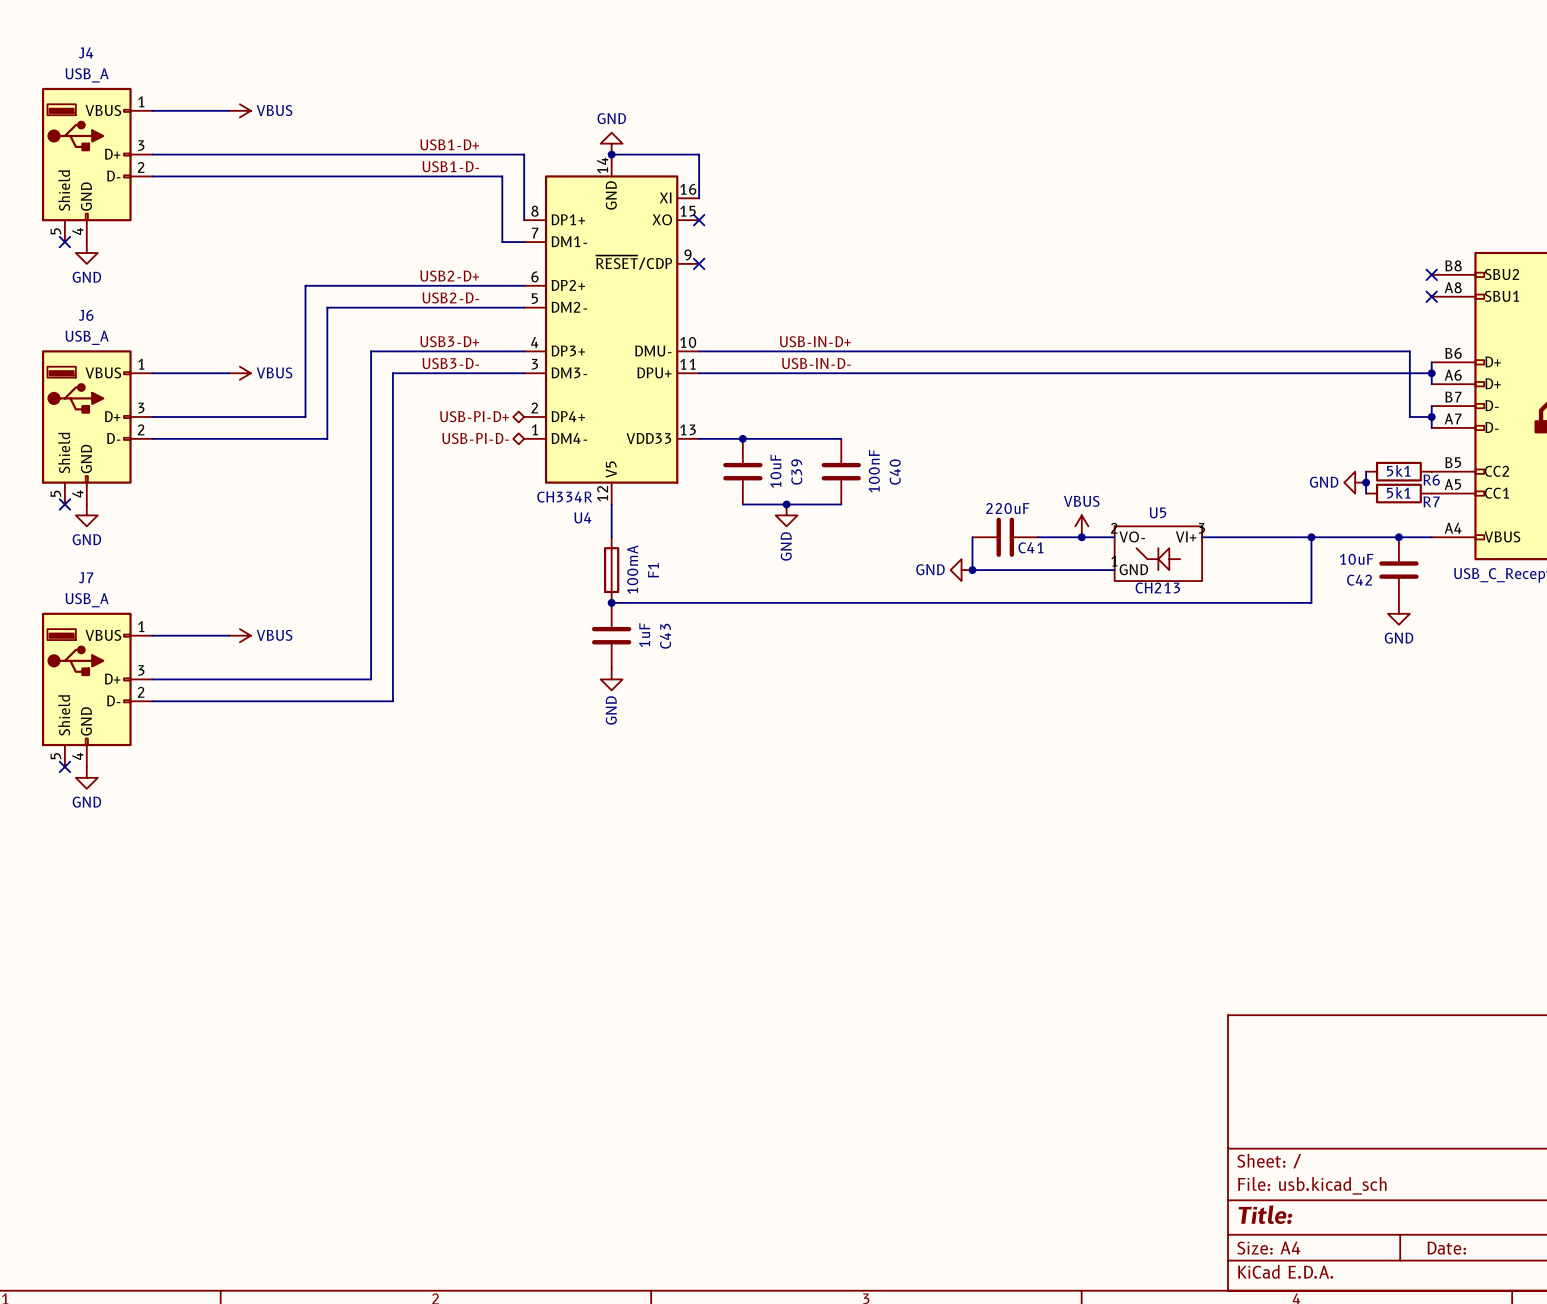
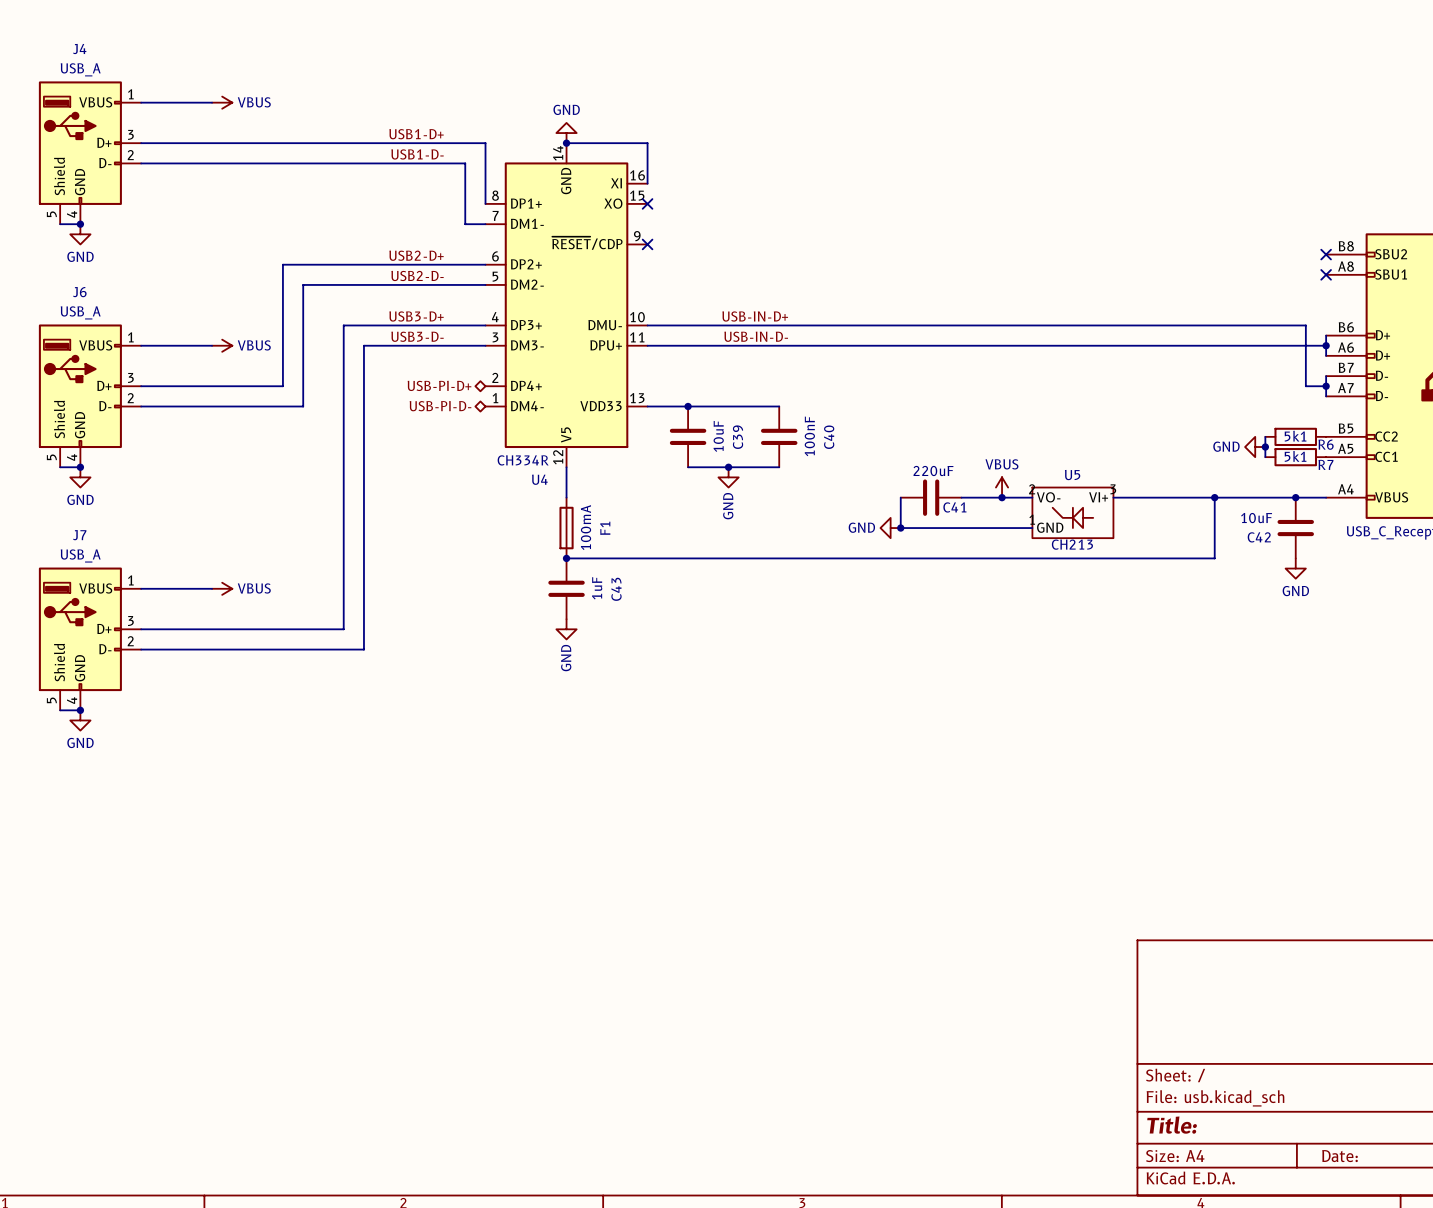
wire: none -> (60, 224) (80, 224)
no-connect mark: (64, 242) -> none
junction: none -> (80, 224)
wire: none -> (60, 467) (80, 467)
no-connect mark: (64, 504) -> none
junction: none -> (80, 467)
wire: none -> (60, 710) (80, 710)
no-connect mark: (64, 766) -> none
junction: none -> (80, 710)

